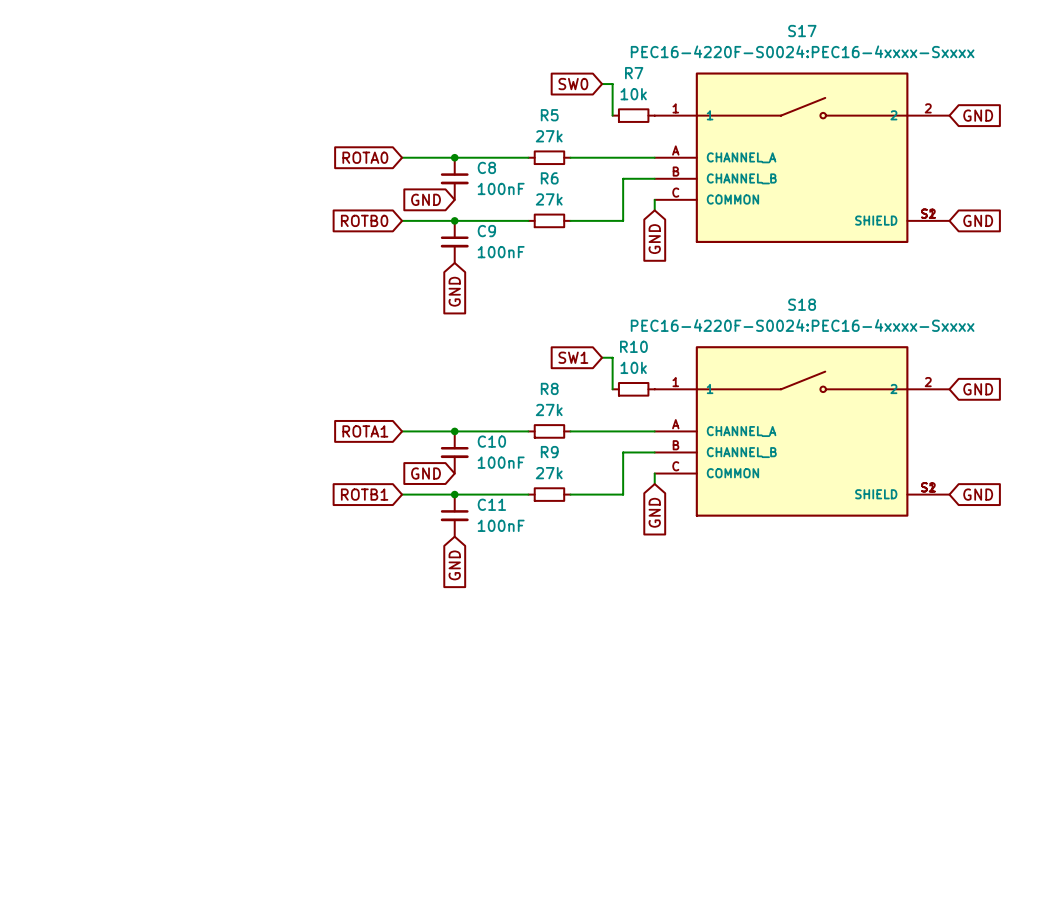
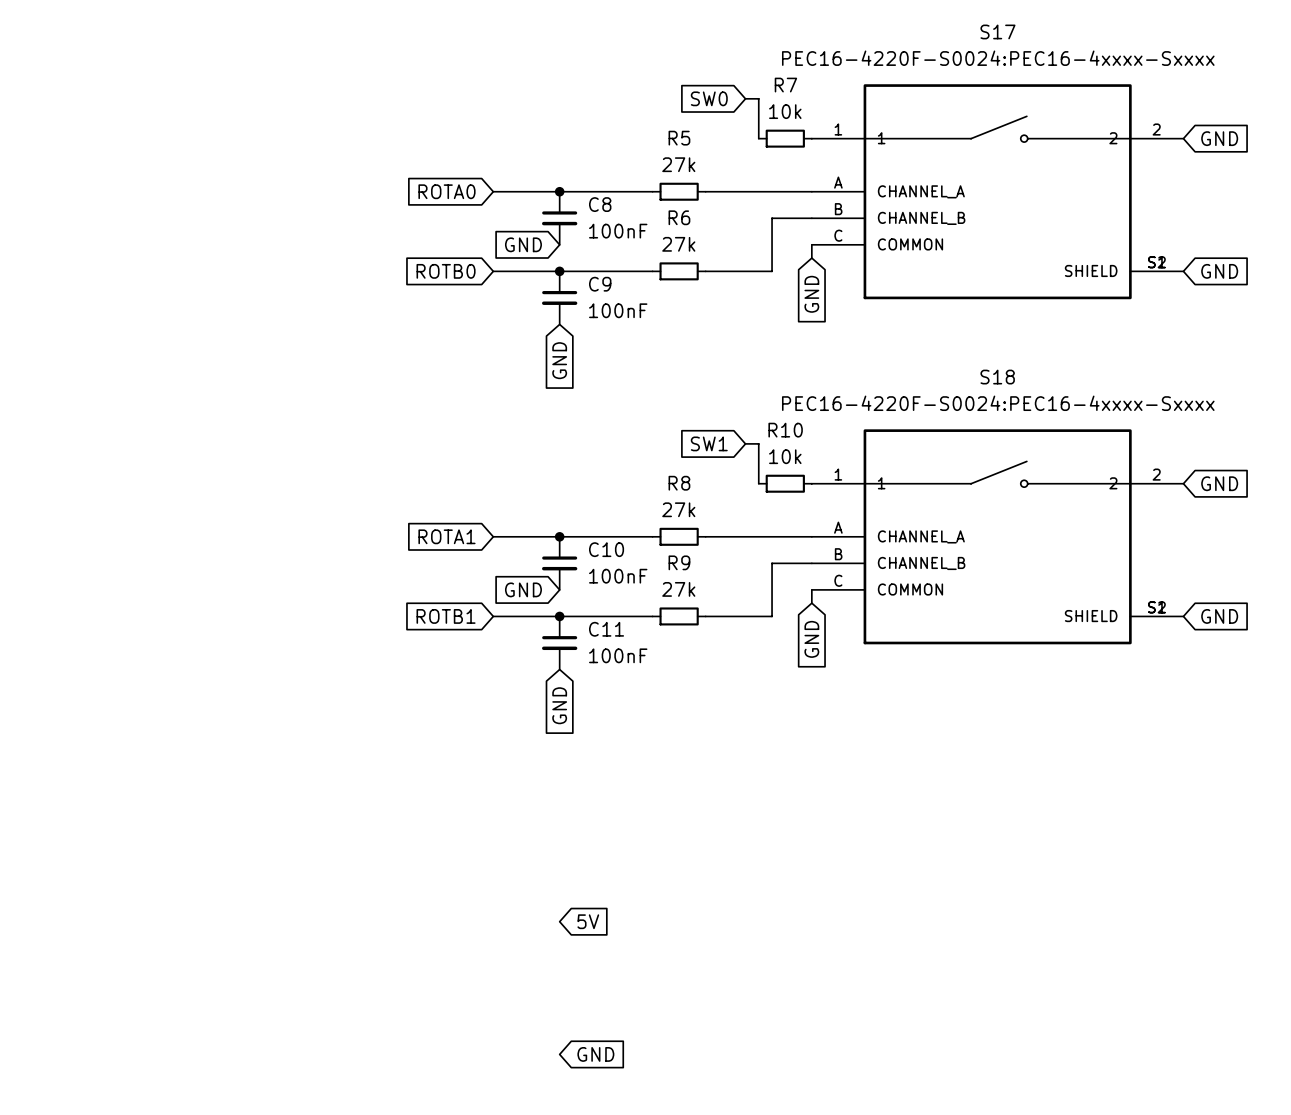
global label: none -> 5V (588, 921)
global label: none -> GND (595, 1054)

